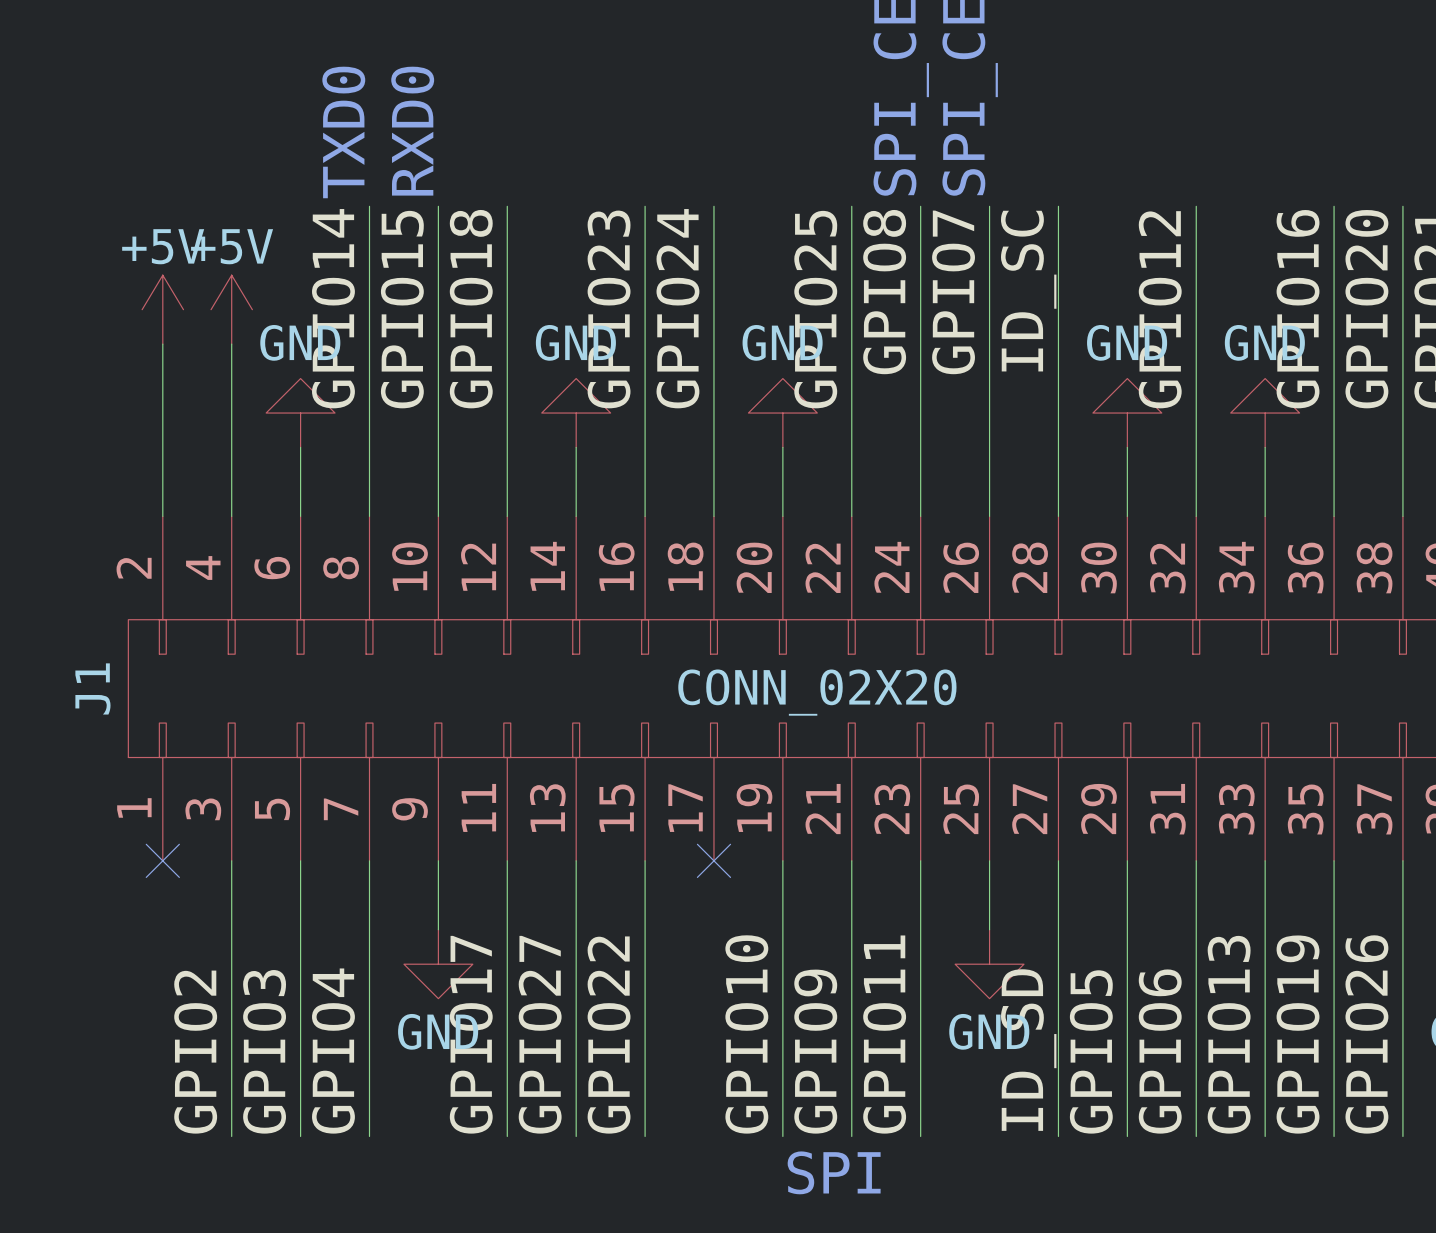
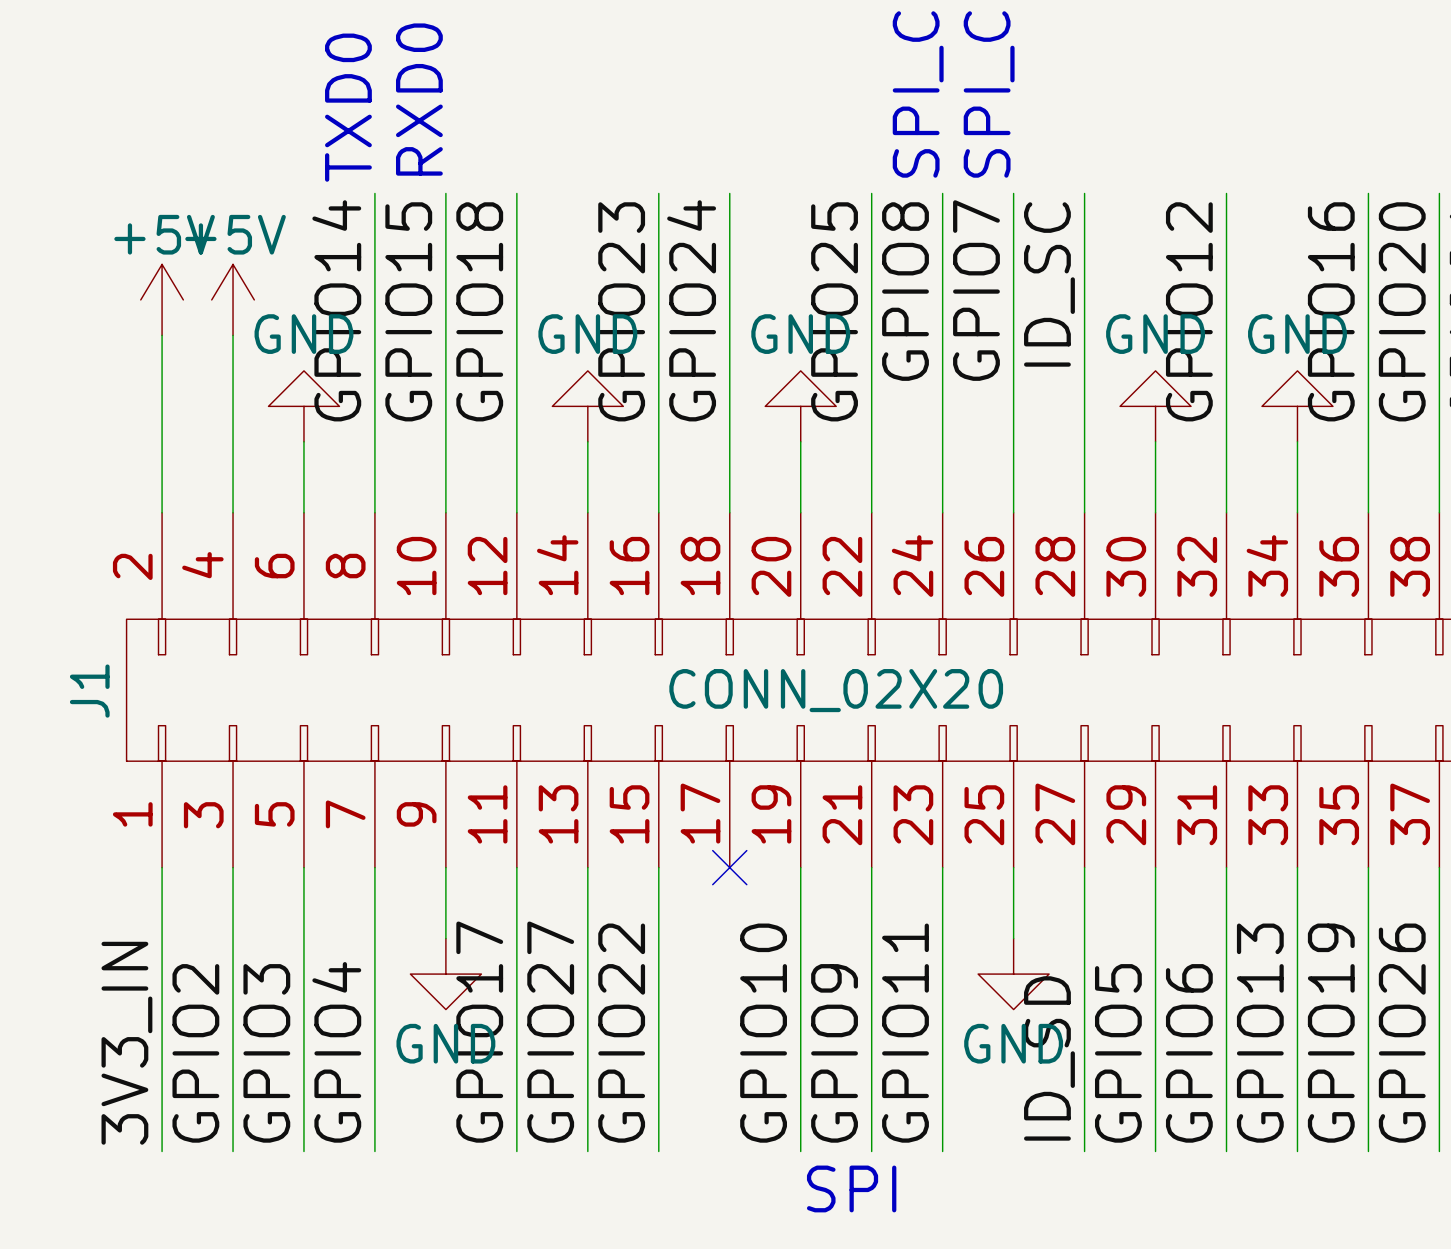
wire: none -> (162, 867) (162, 1151)
no-connect mark: (162, 860) -> none
label: none -> 3V3_IN (126, 1043)

